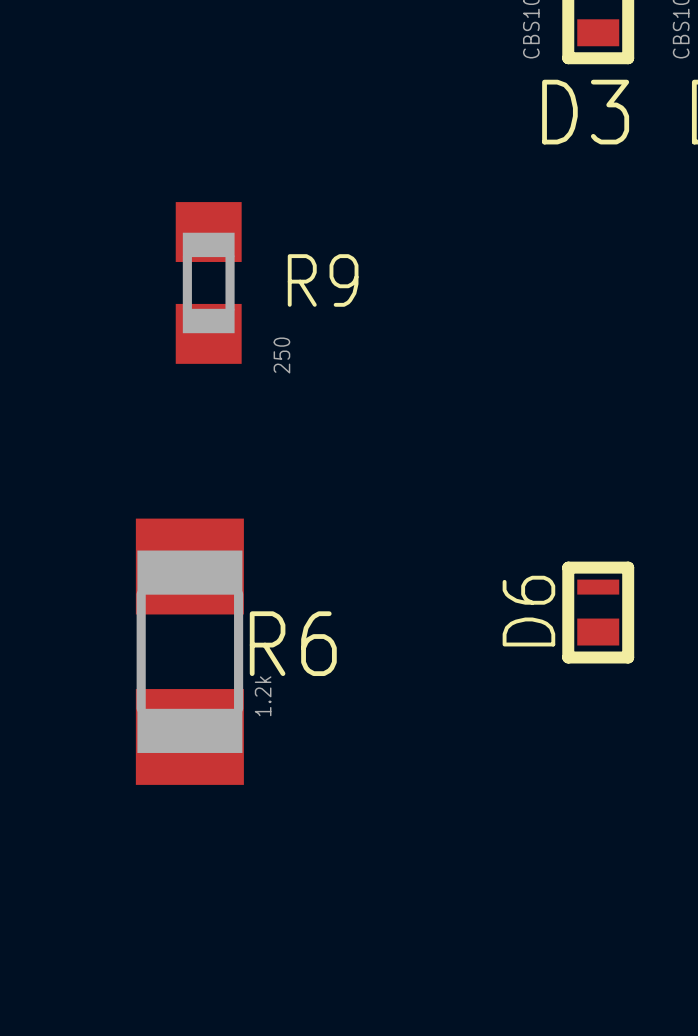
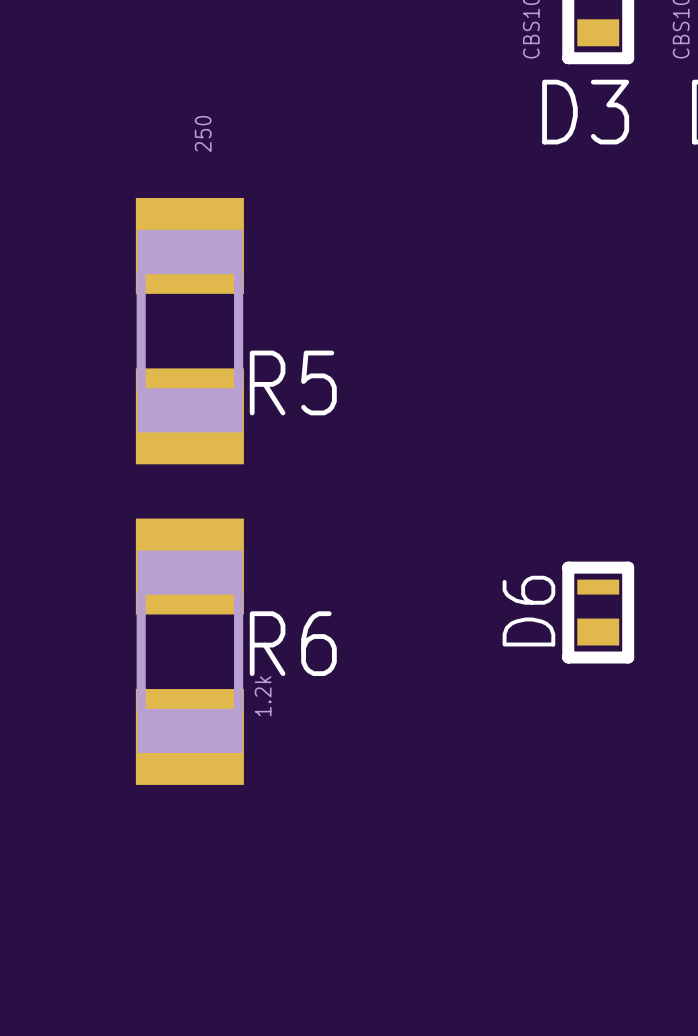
R9: 250 (208, 282) -> none
R5: none -> 250 (189, 331)

